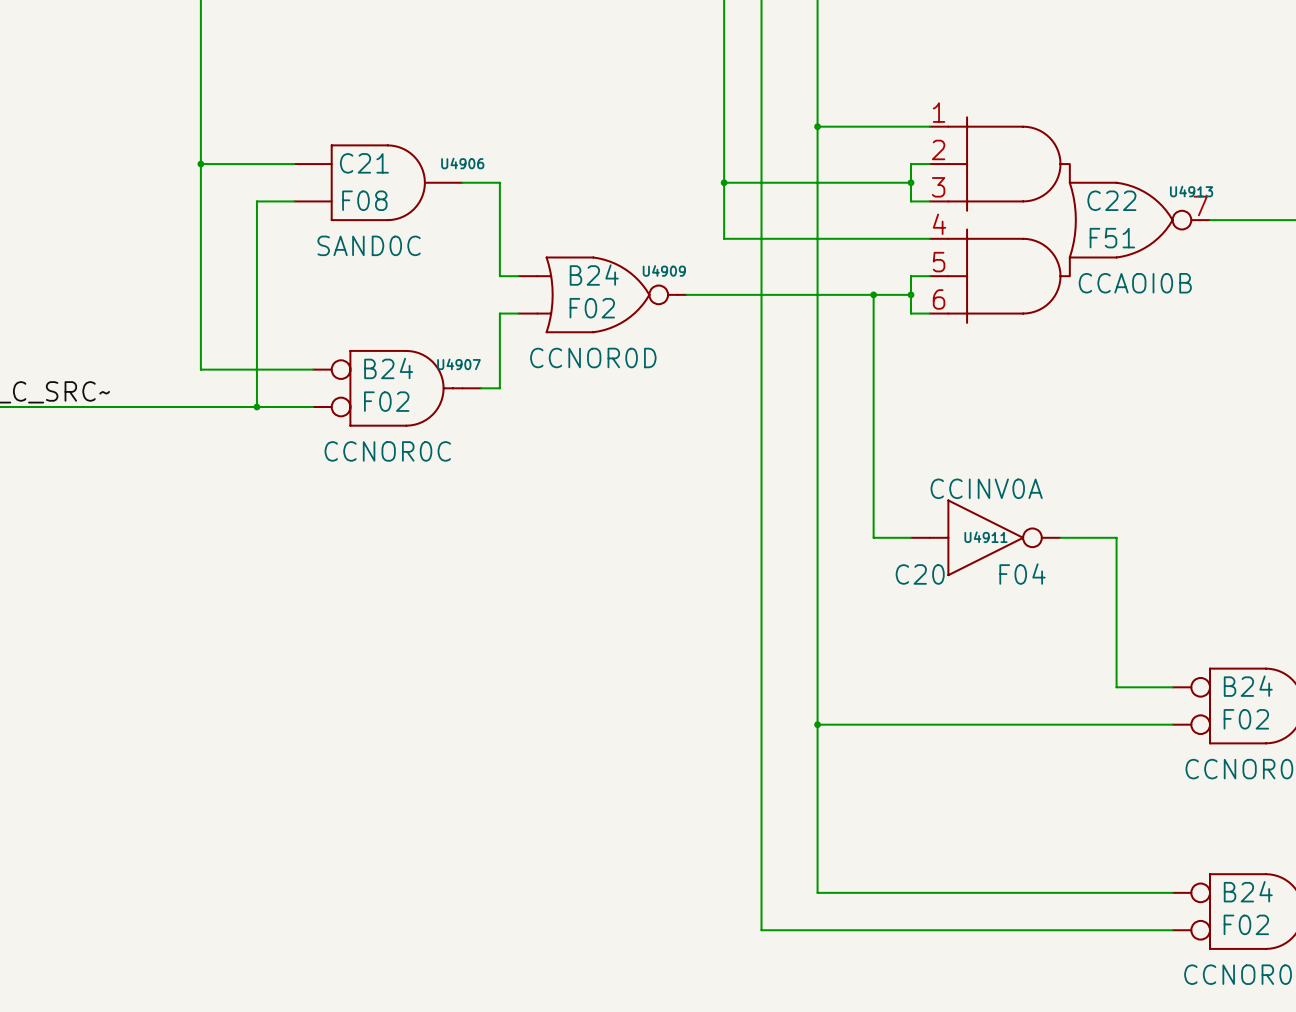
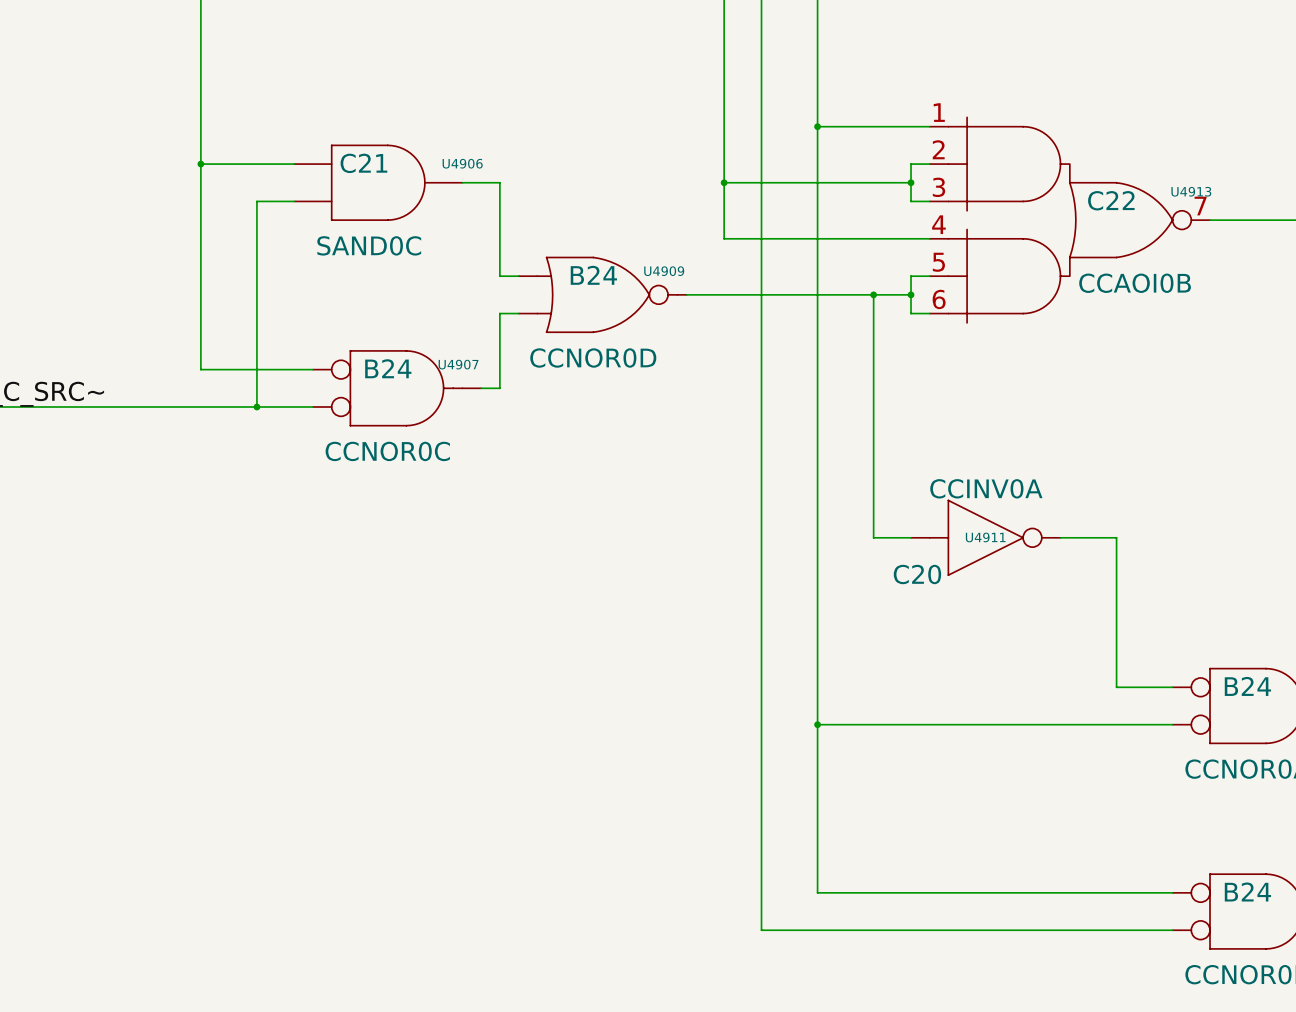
U4906 value: F08 (364, 200) -> none
U4913 value: F51 (1112, 238) -> none
U4909 value: F02 (592, 308) -> none
U4907 value: F02 (386, 401) -> none
U4911 value: F04 (1022, 574) -> none
part value: F02 (1246, 719) -> none
part value: F02 (1246, 924) -> none

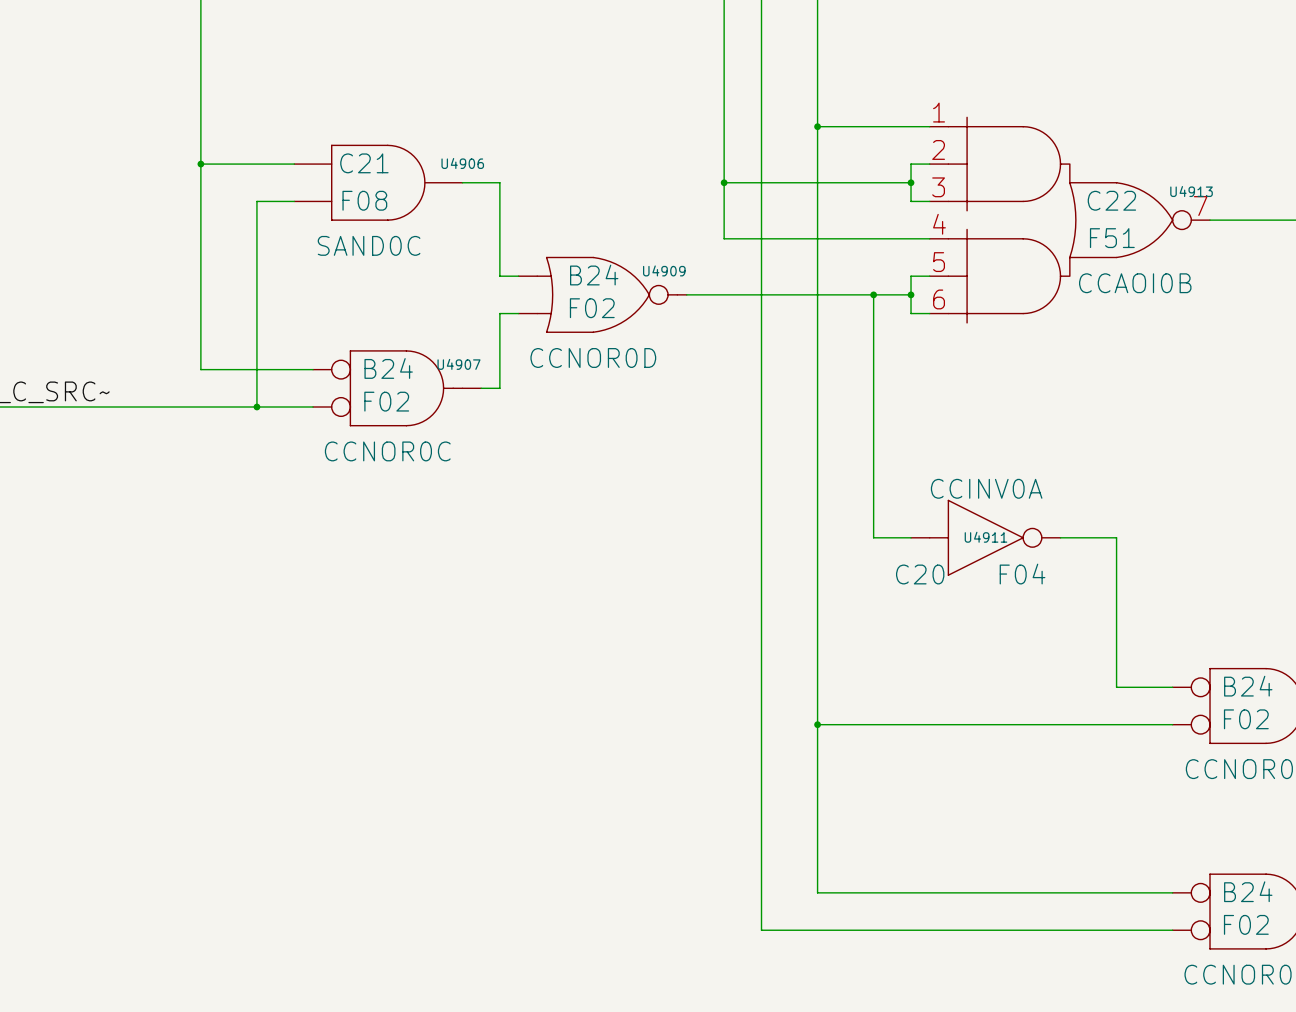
U4906 value: none -> F08 (364, 200)
U4913 value: none -> F51 (1112, 238)
U4909 value: none -> F02 (592, 308)
U4907 value: none -> F02 (386, 401)
U4911 value: none -> F04 (1022, 574)
part value: none -> F02 (1246, 719)
part value: none -> F02 (1246, 924)

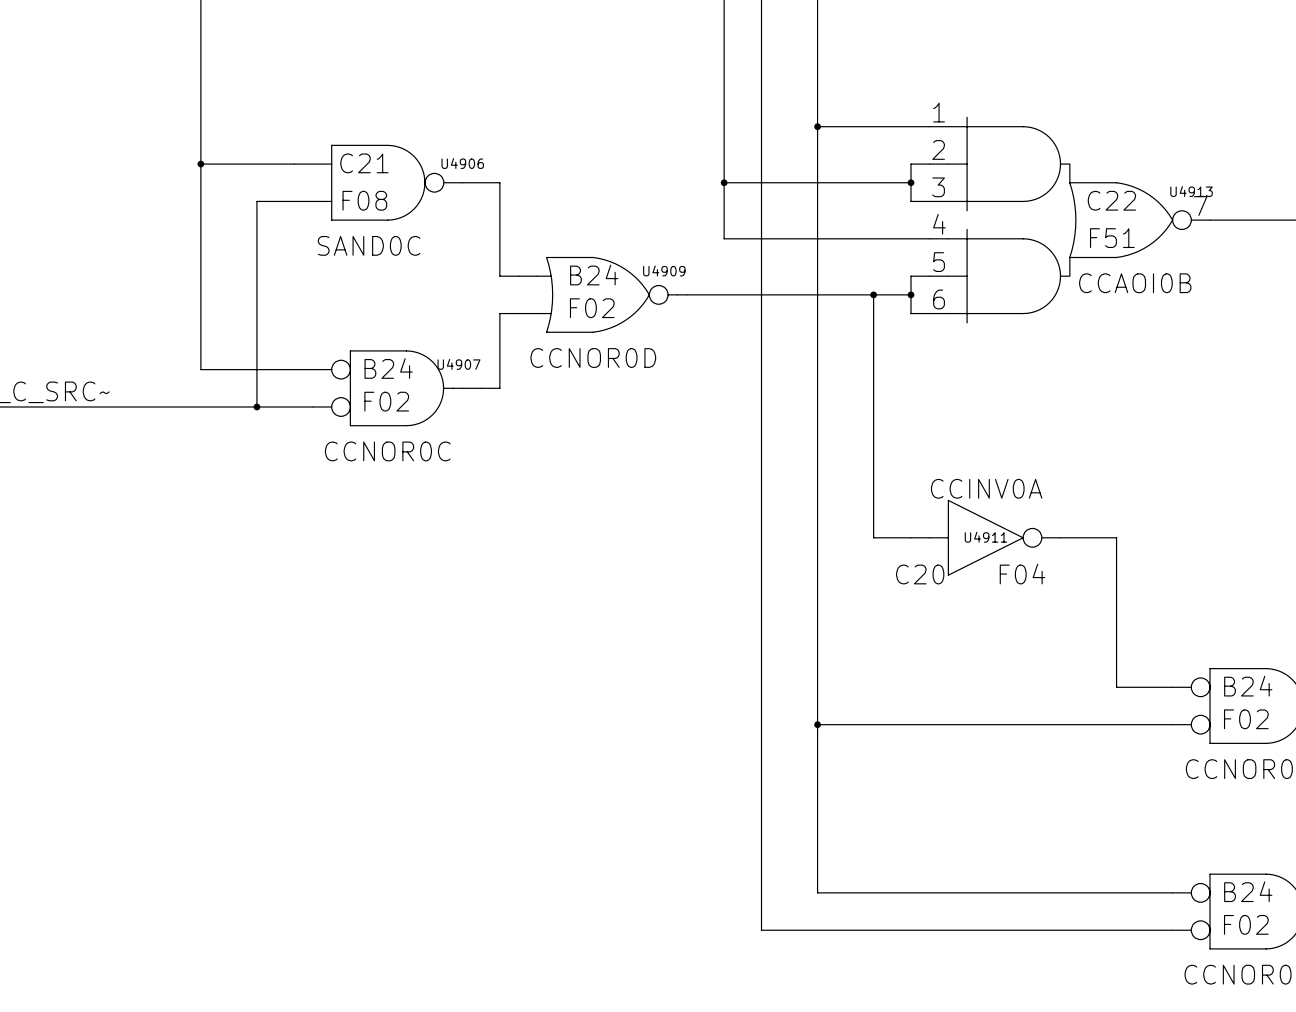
U4906 symbol: [294, 144, 463, 221] -> [294, 144, 463, 221]

